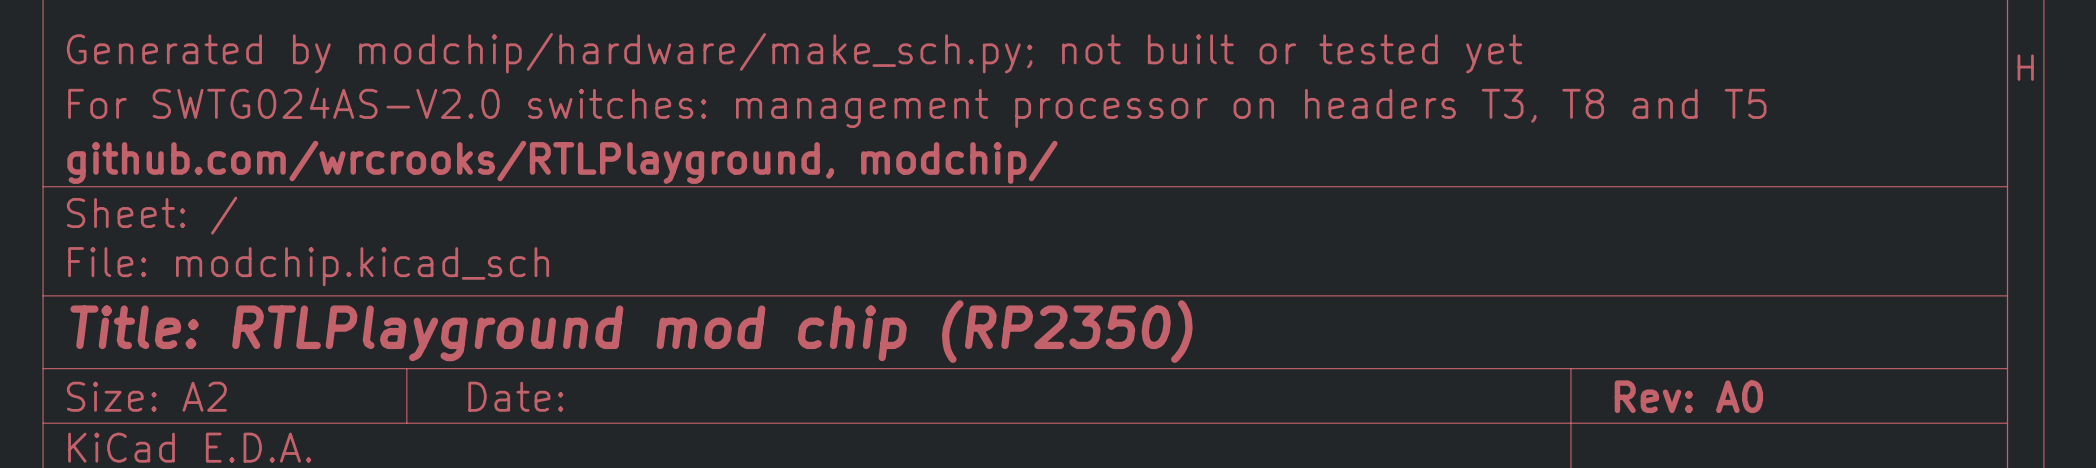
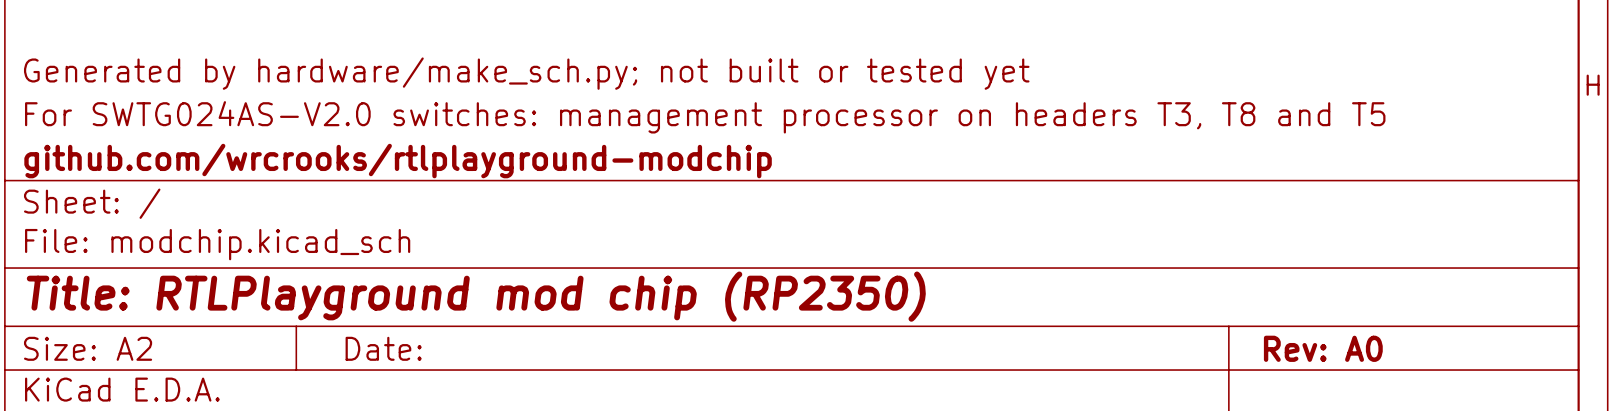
title block: Generated by modchip/hardware/make_sch.py; not built or tested yet (794, 53) -> Generated by hardware/make_sch.py; not built or tested yet (526, 73)
title block: github.com/wrcrooks/RTLPlayground, modchip/ (562, 162) -> github.com/wrcrooks/rtlplayground-modchip (398, 161)

